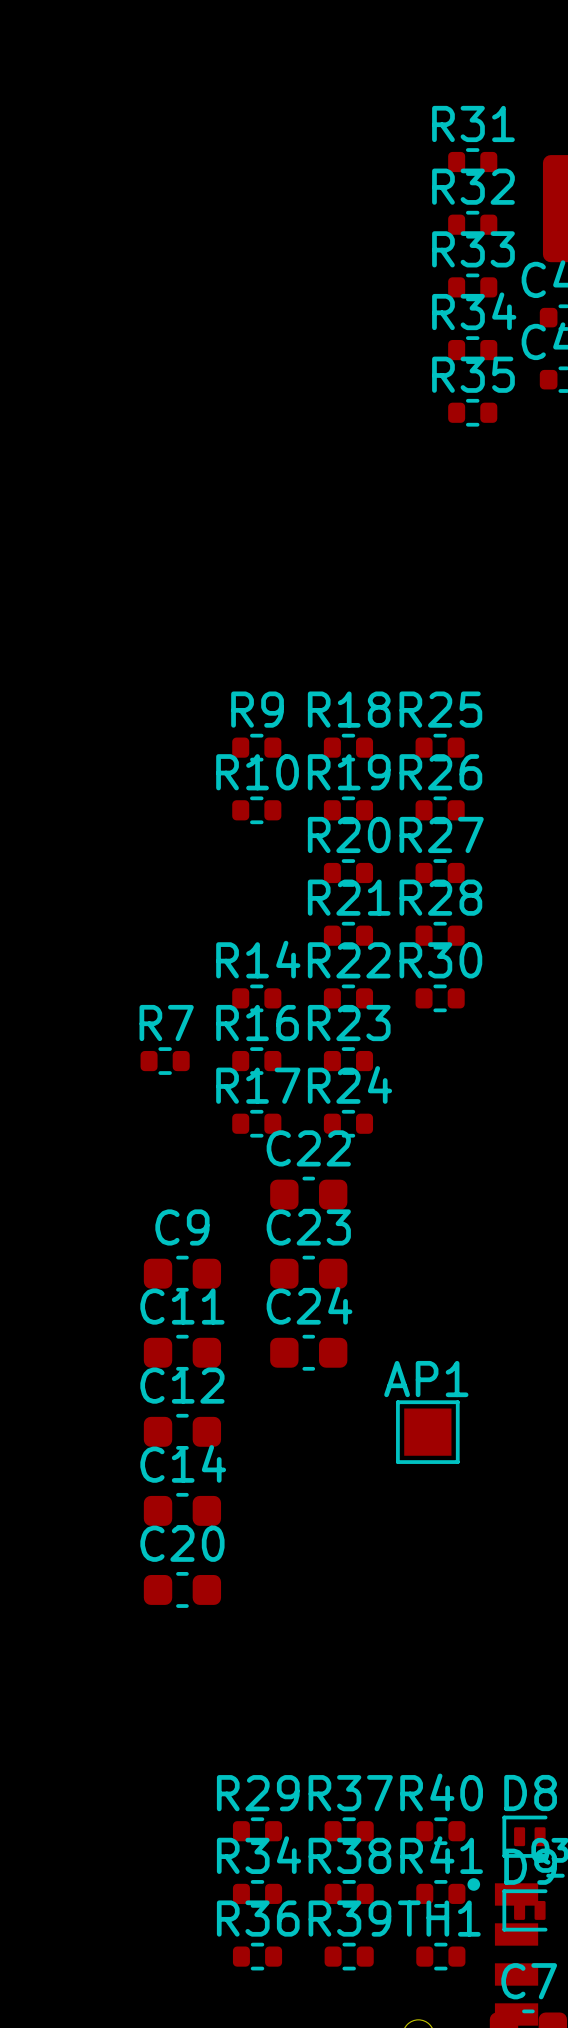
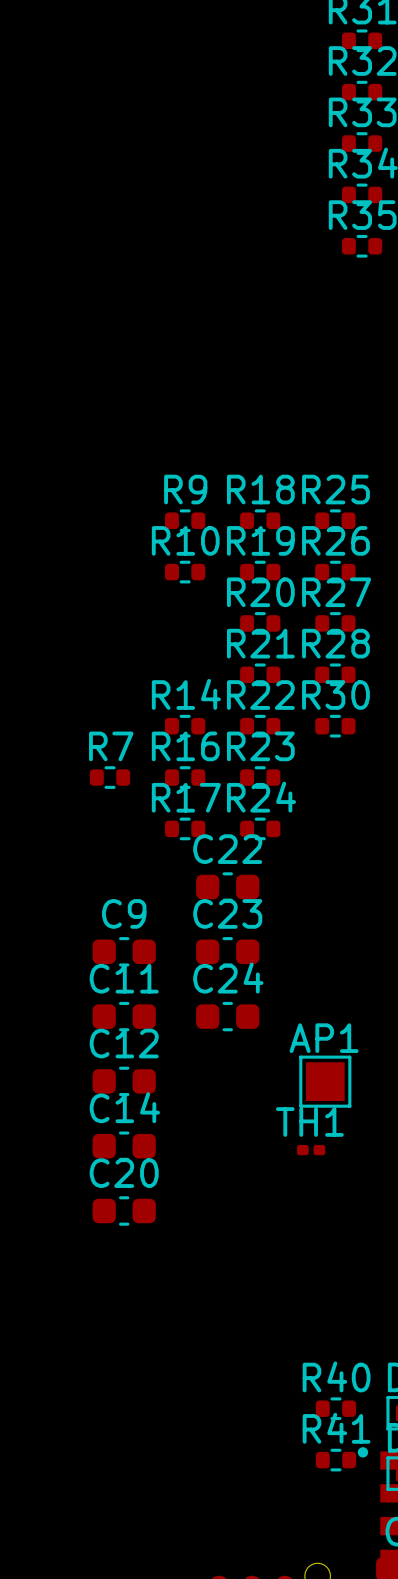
R29: (257, 1831) -> none
R37: (349, 1831) -> none
R34: (257, 1893) -> none
R38: (349, 1893) -> none
TH1 footprint: [416, 1942, 466, 1971] -> [296, 1144, 326, 1156]
R36: (257, 1956) -> none
R39: (349, 1956) -> none

